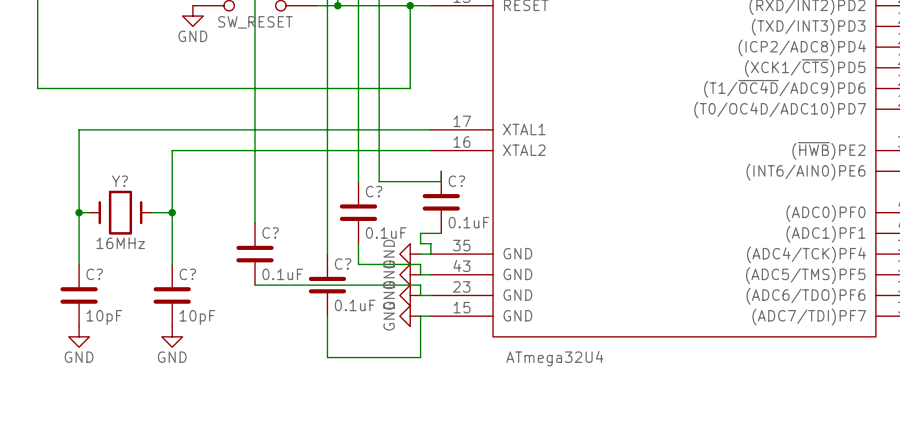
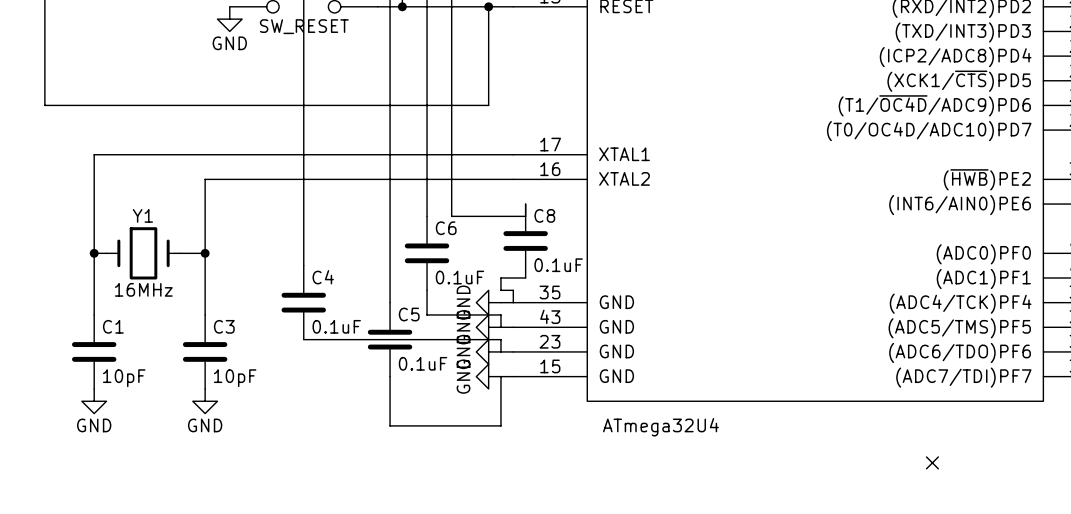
Y? name: Y? (119, 181) -> Y1 (142, 215)
C? name: C? (456, 181) -> C8 (544, 215)
C? name: C? (374, 191) -> C6 (446, 228)
C? name: C? (270, 232) -> C4 (323, 277)
C? name: C? (343, 264) -> C5 (409, 314)
C? name: C? (94, 274) -> C1 (113, 326)
C? name: C? (187, 274) -> C3 (224, 326)
no-connect mark: none -> (932, 462)

